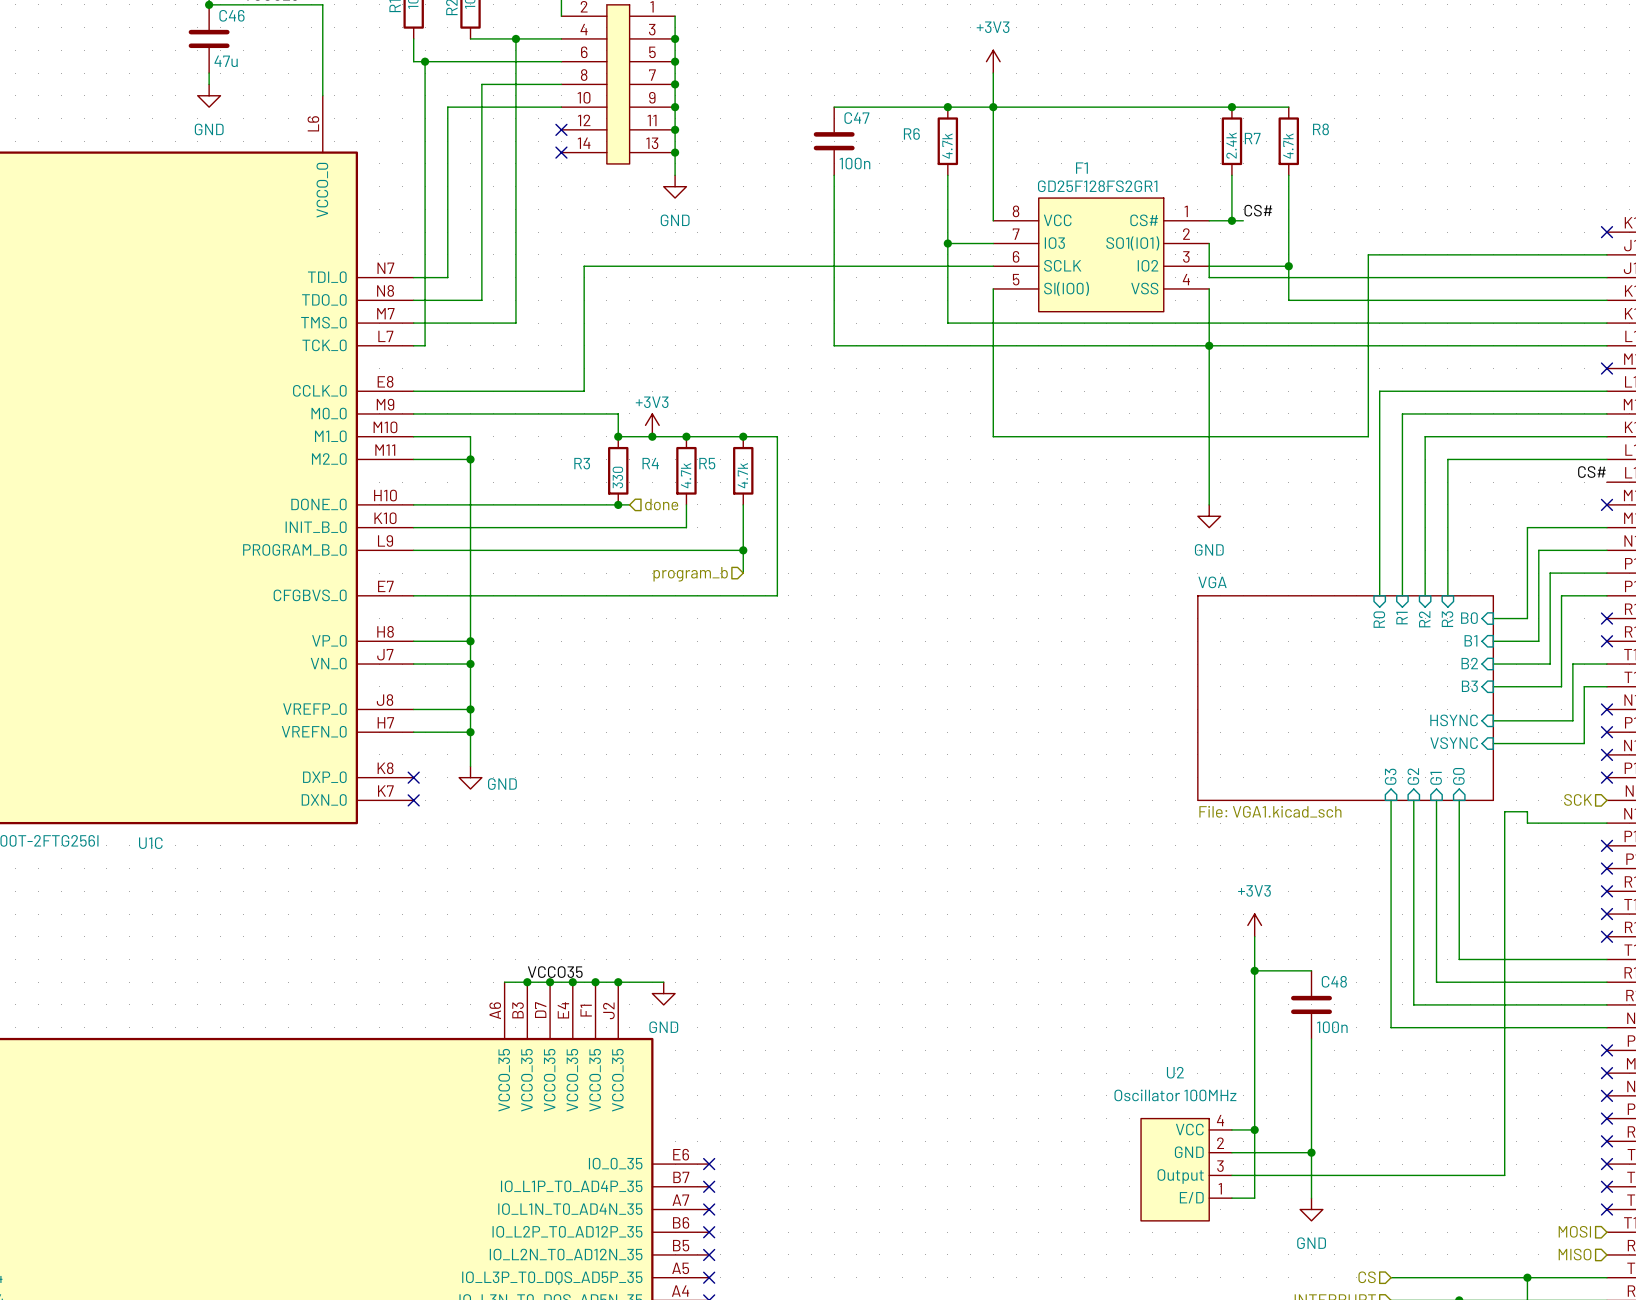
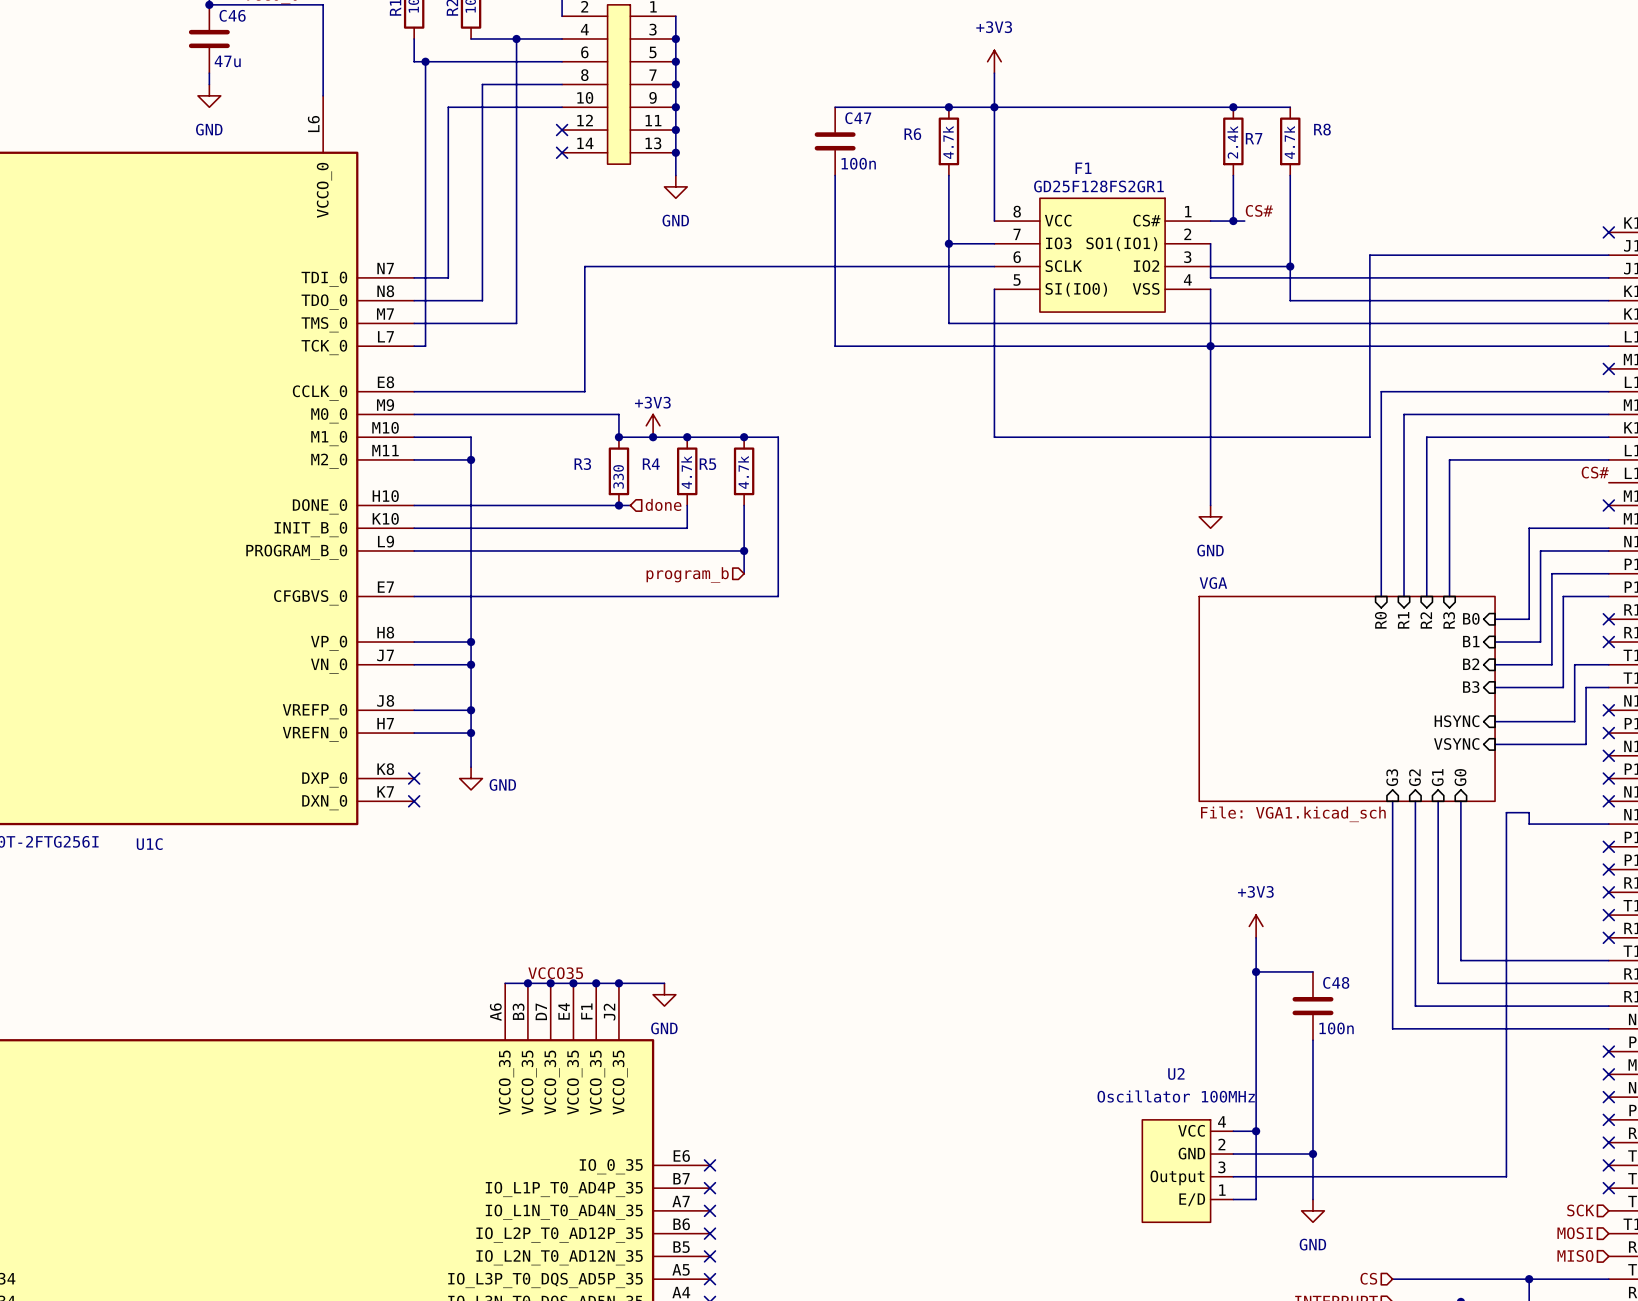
hierarchical label: SCK (1578, 799) -> none
no-connect mark: none -> (1608, 801)
hierarchical label: none -> SCK (1580, 1210)
no-connect mark: (1606, 1209) -> none

